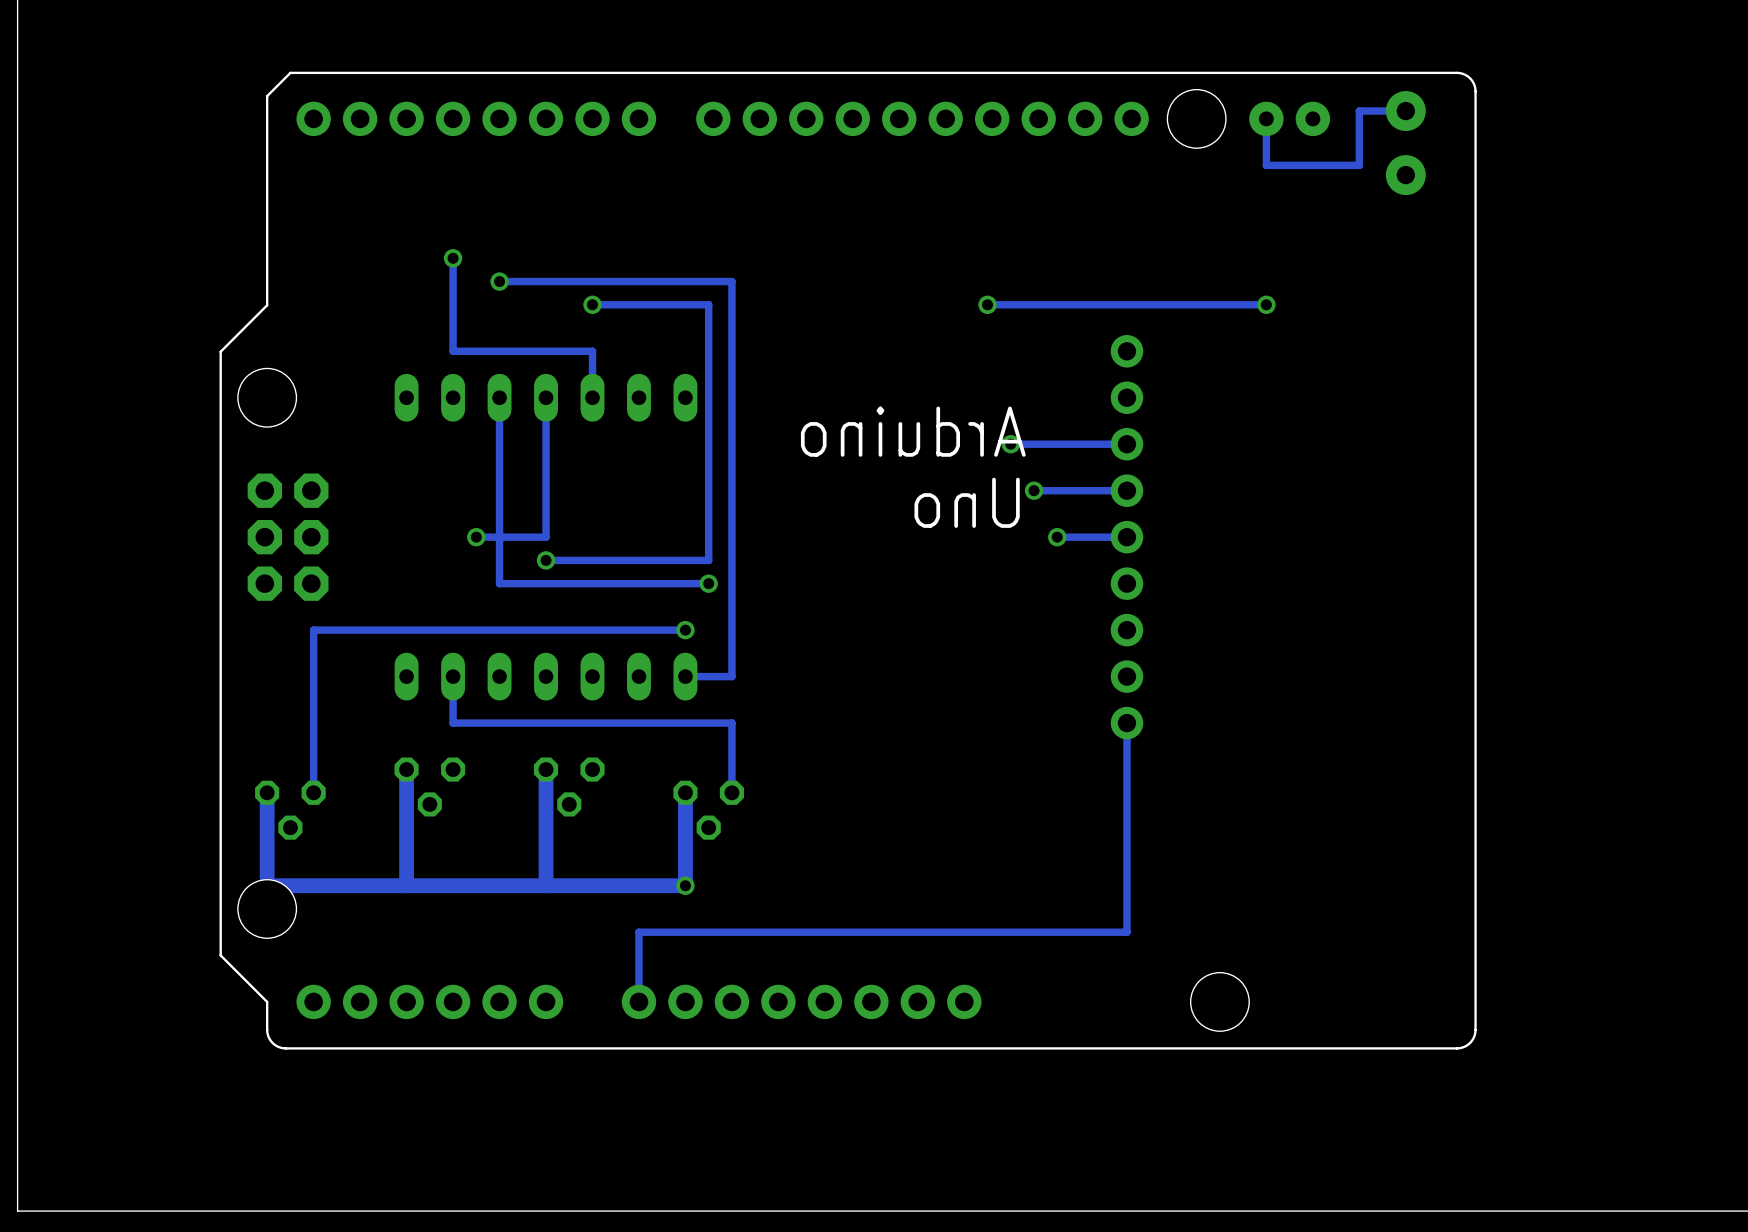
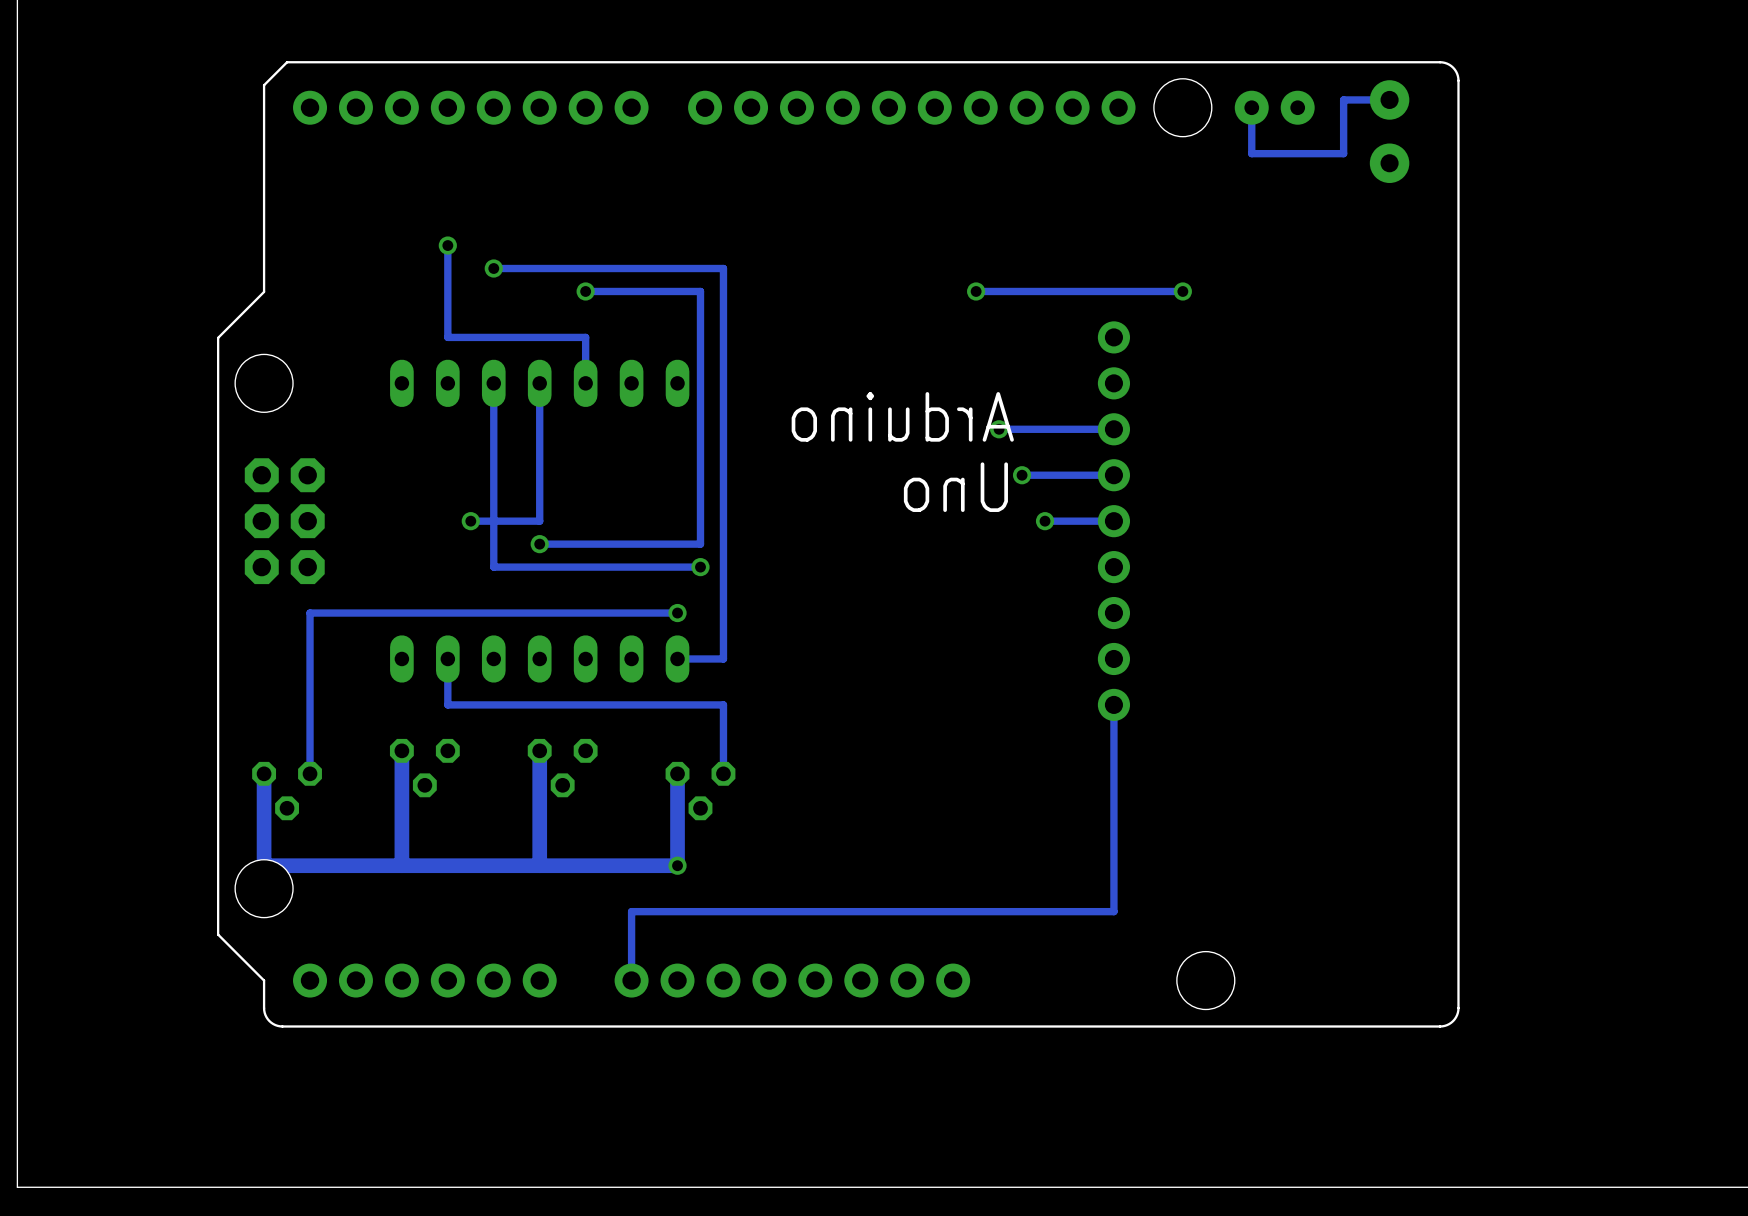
track: (1266, 304) (1196, 304) -> none
via position: (1266, 304) -> (1182, 291)

